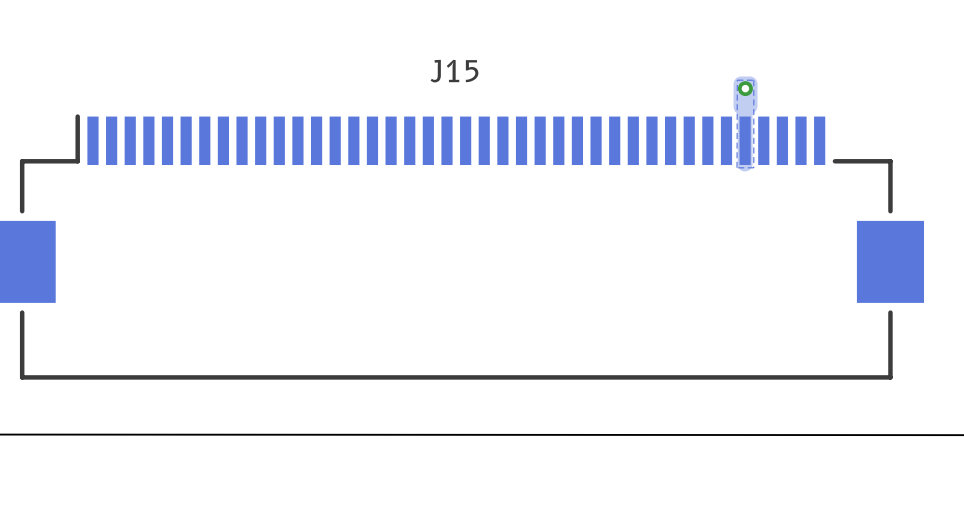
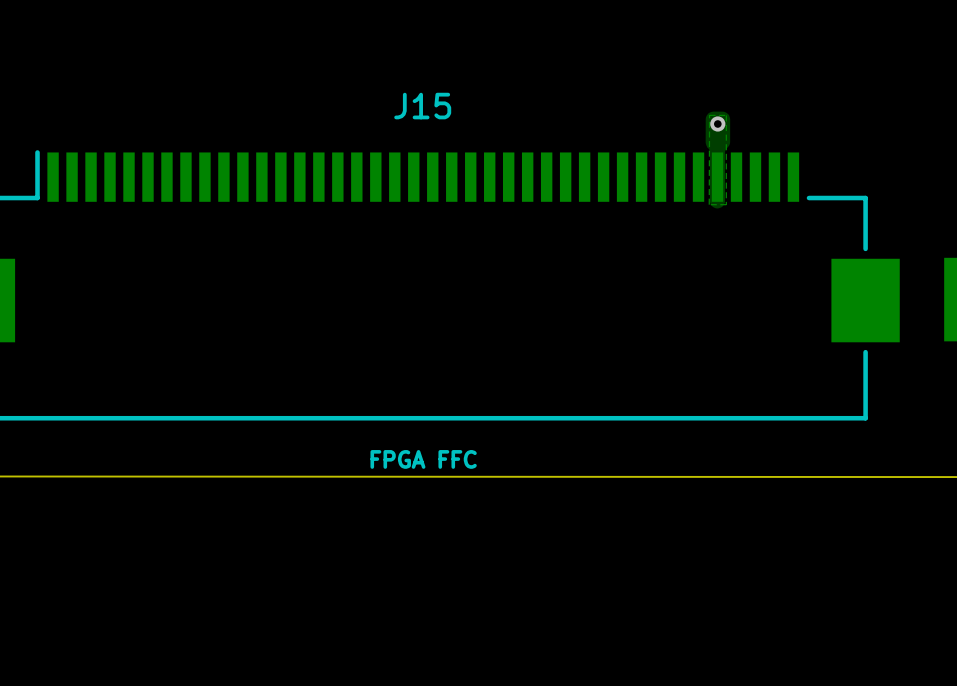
J15 value: none -> FPGA FFC (423, 459)

